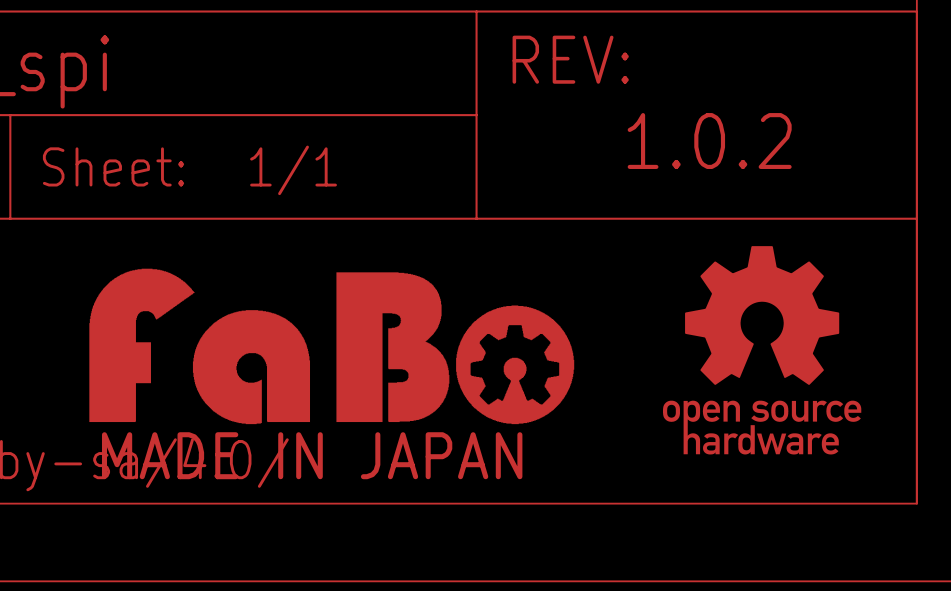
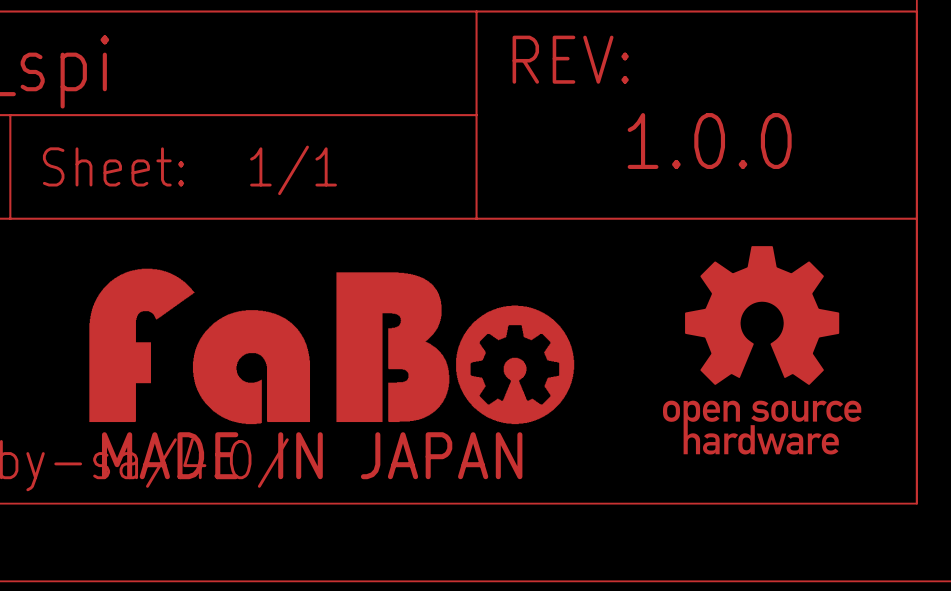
text: 1.0.2 (709, 141) -> 1.0.0 (709, 141)

